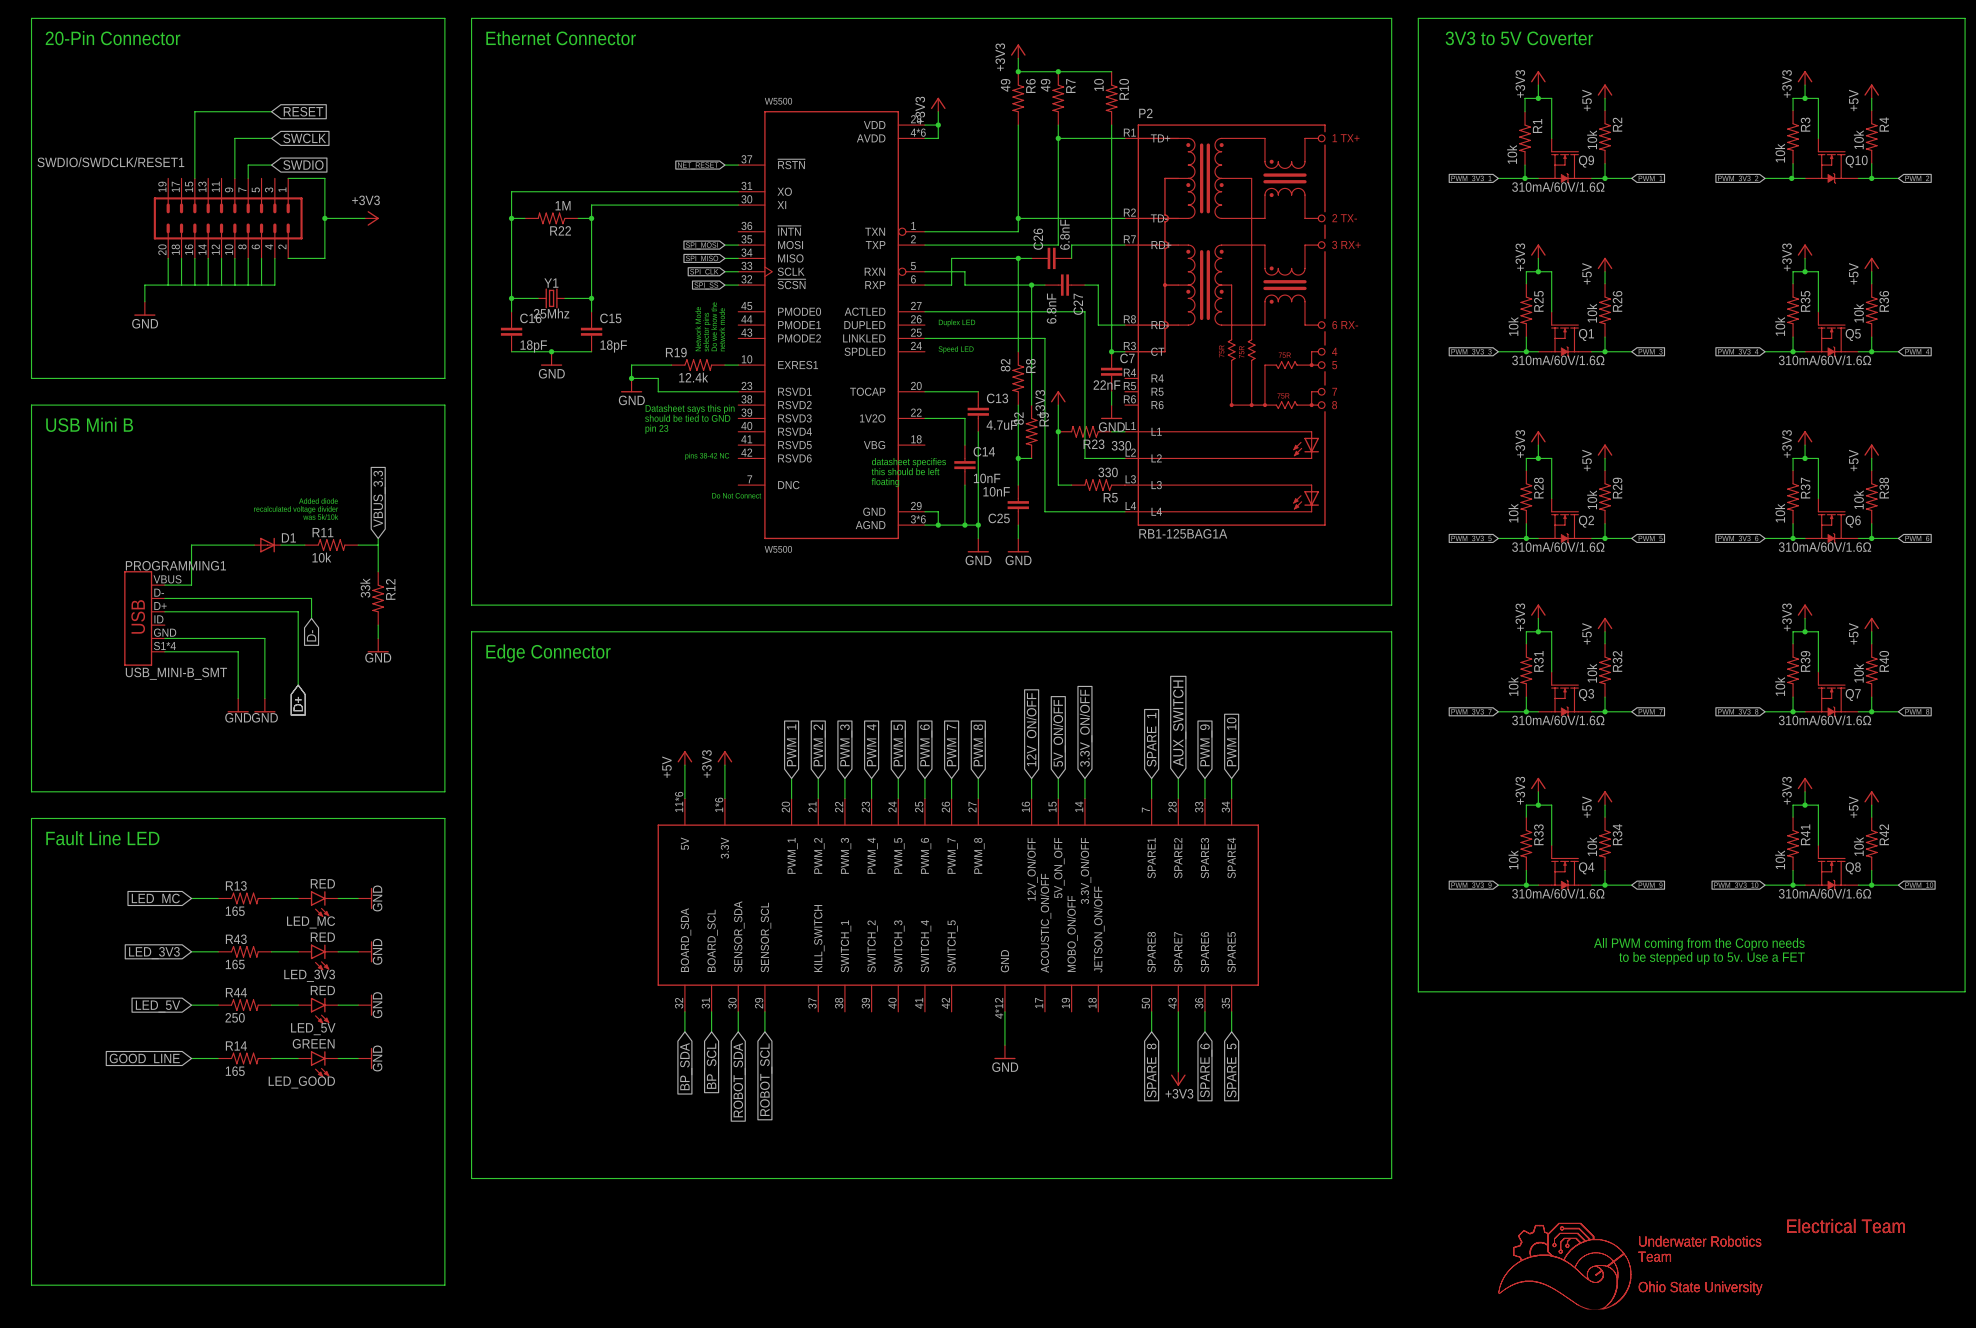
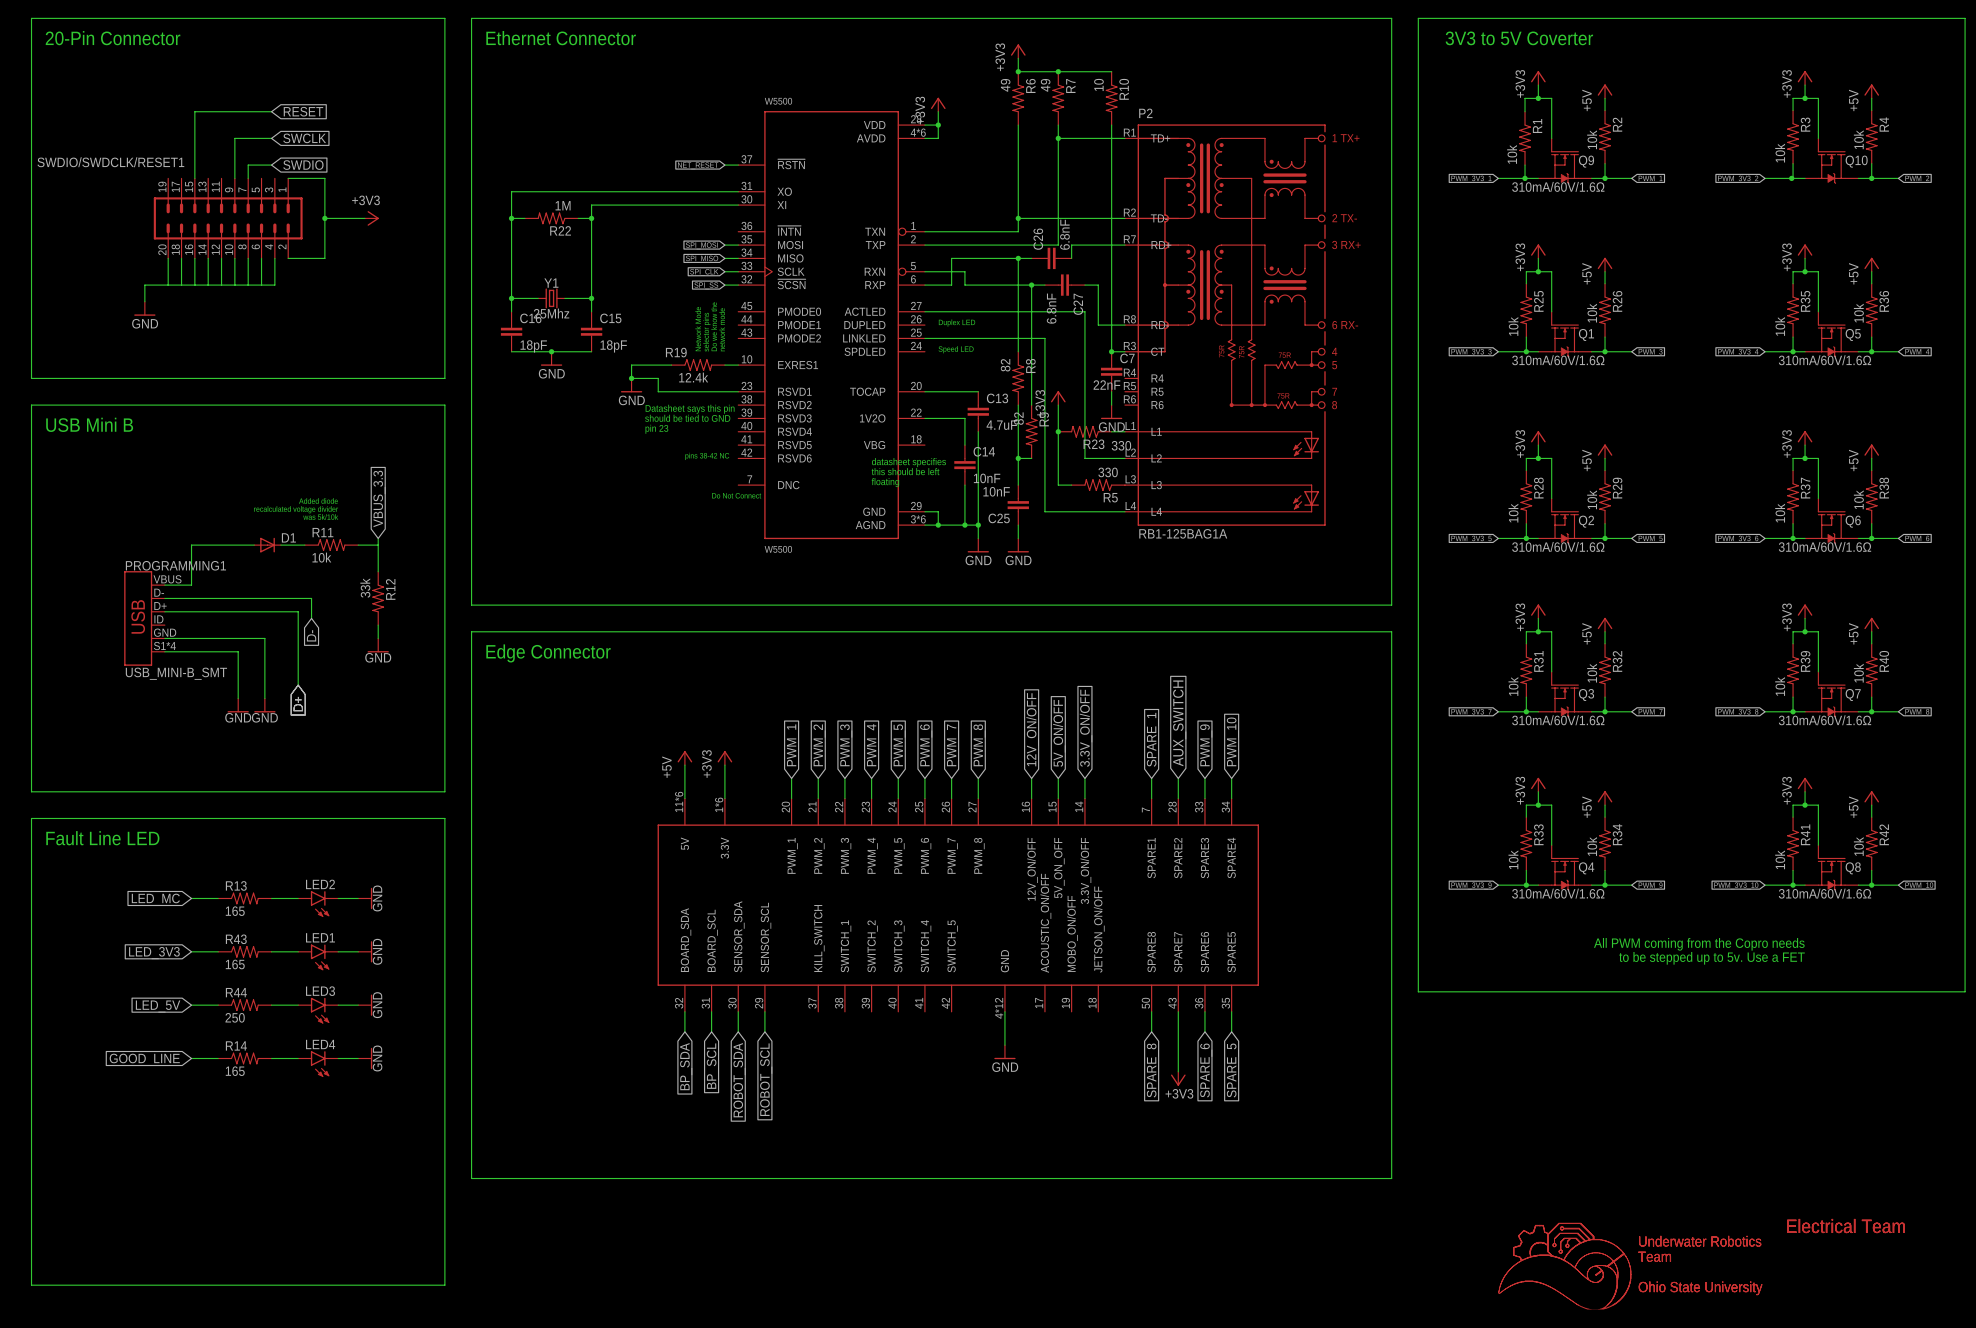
LED_MC: RED (318, 904) -> none
LED2: none -> (318, 904)
LED_3V3: RED (318, 957) -> none
LED1: none -> (318, 957)
LED_5V: RED (318, 1010) -> none
LED3: none -> (318, 1010)
LED_GOOD: GREEN (318, 1064) -> none
LED4: none -> (318, 1064)

